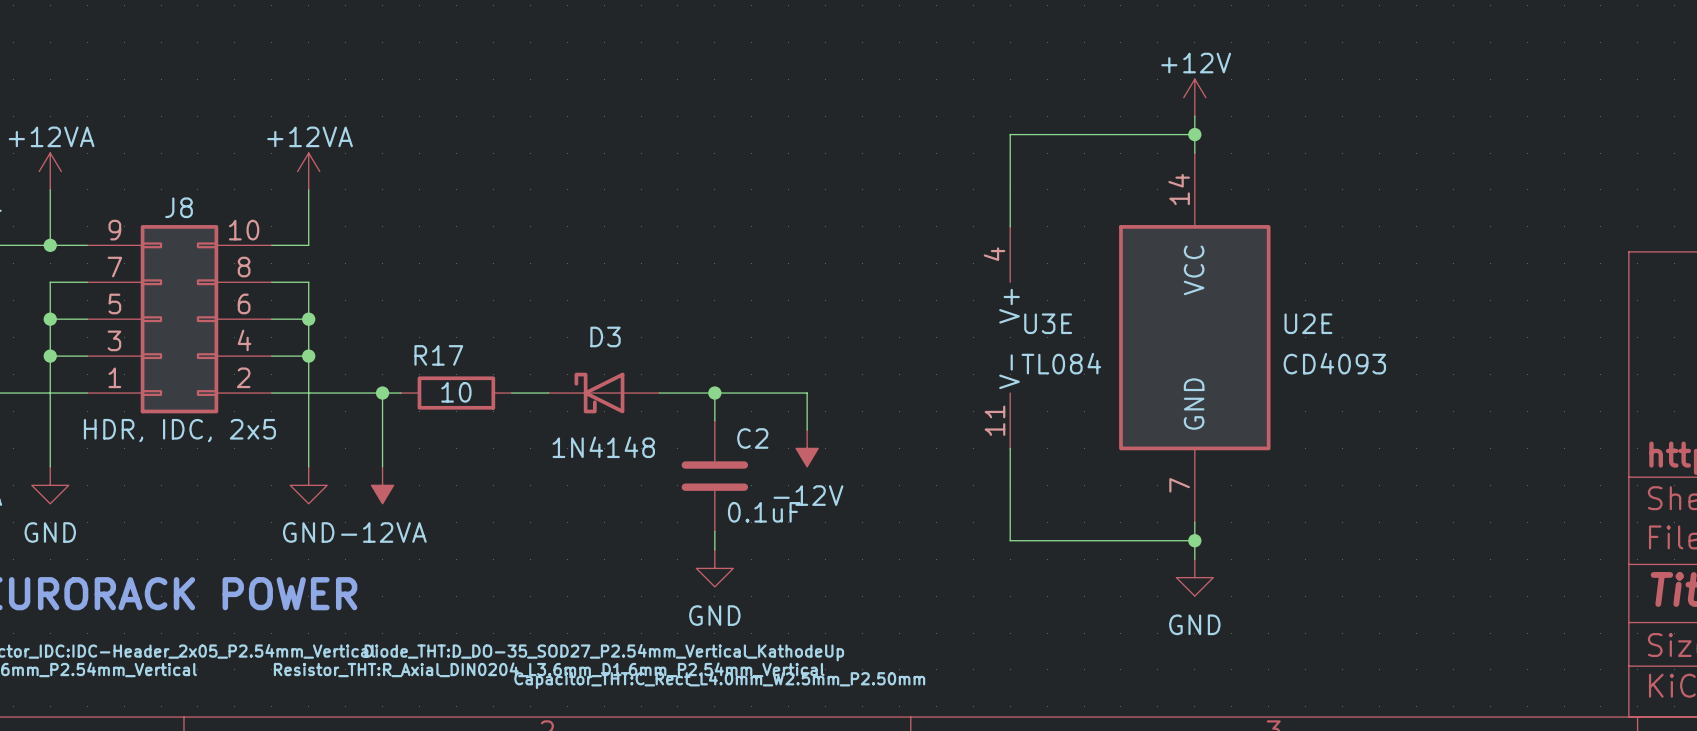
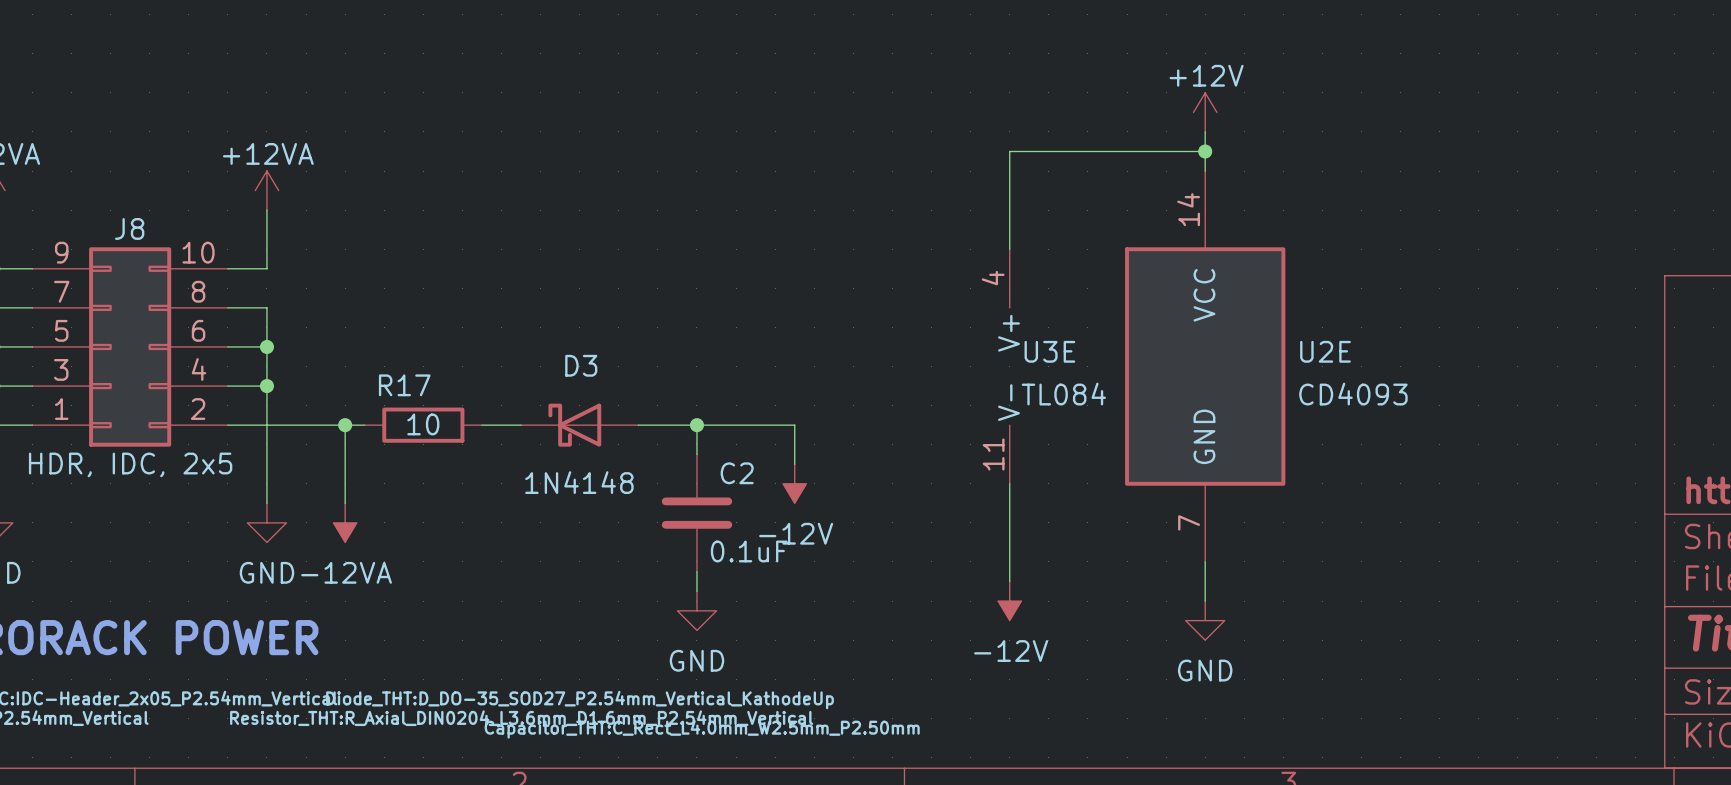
wire: (1010, 540) (1194, 540) -> none
junction: (1194, 540) -> none
power symbol: none -> -12V (1009, 601)

